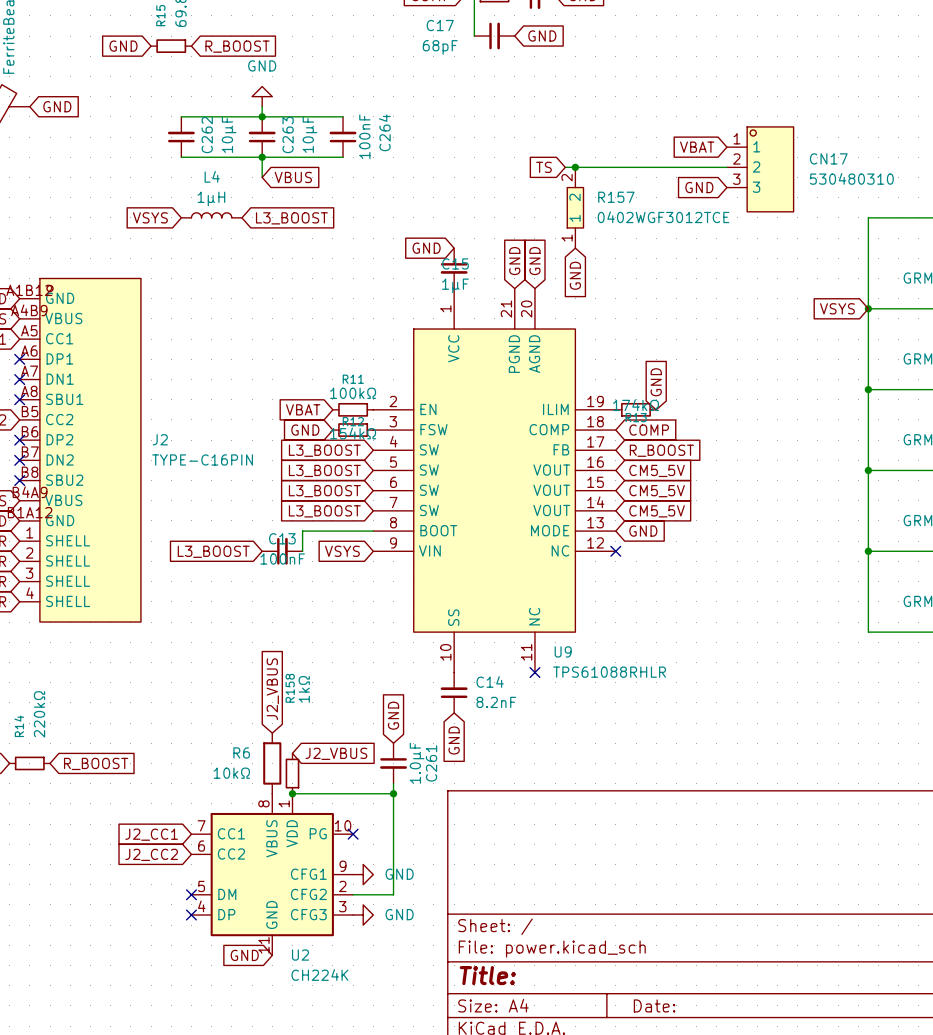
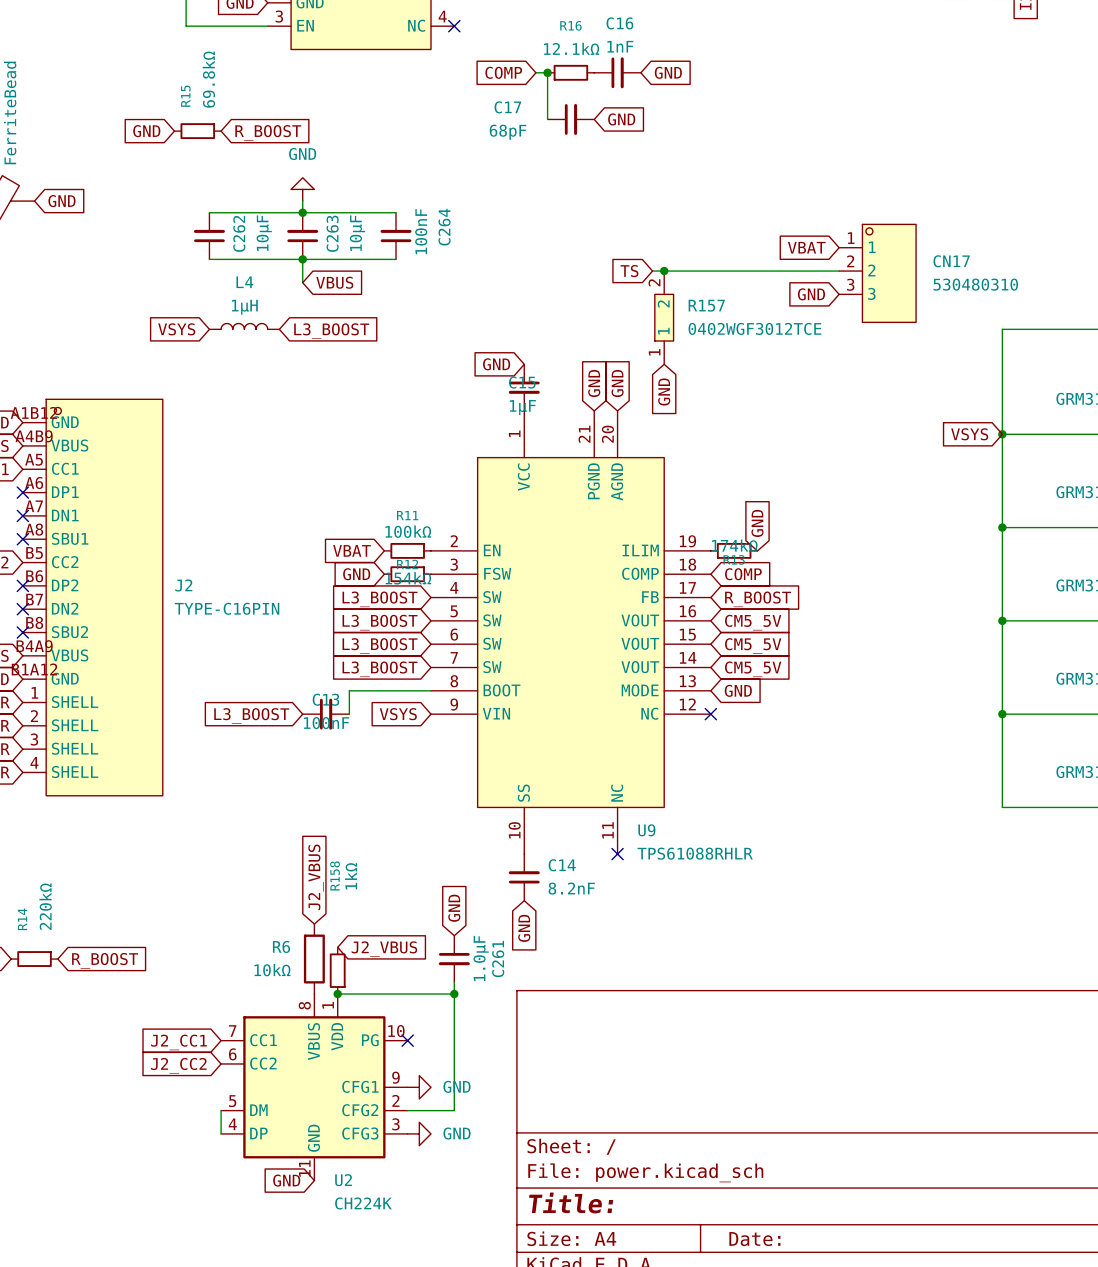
wire: none -> (221, 1110) (221, 1133)
no-connect mark: (191, 894) -> none
no-connect mark: (191, 915) -> none

